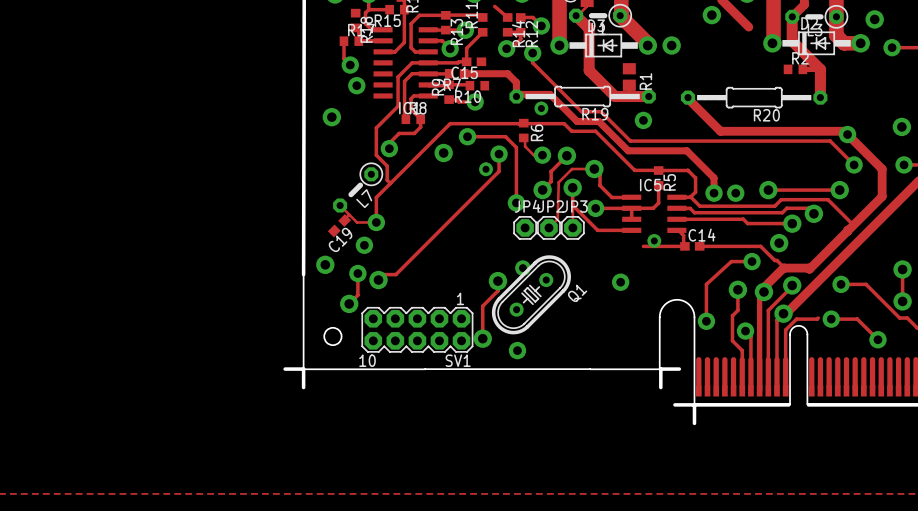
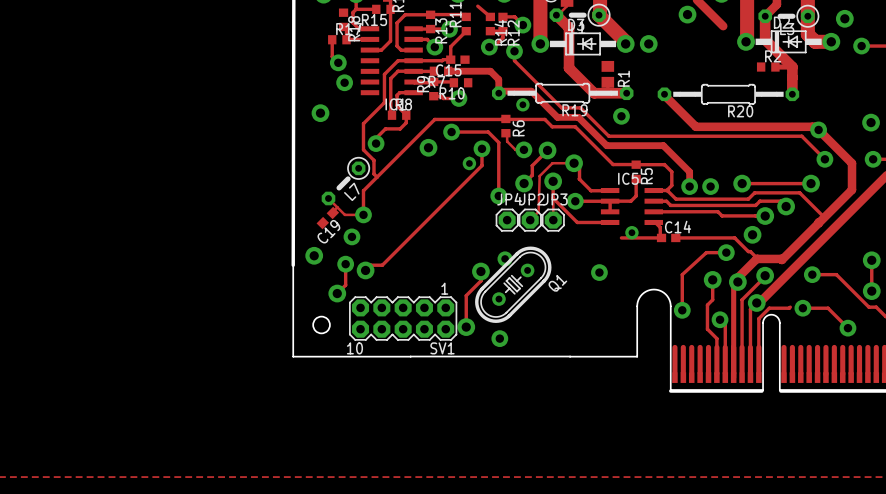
board edge: (285, 369) (303, 369) (303, 387) -> none
board edge: (679, 369) (660, 369) (660, 387) -> none
board edge: (674, 404) (693, 404) -> none
board edge: (694, 404) (694, 423) -> none

